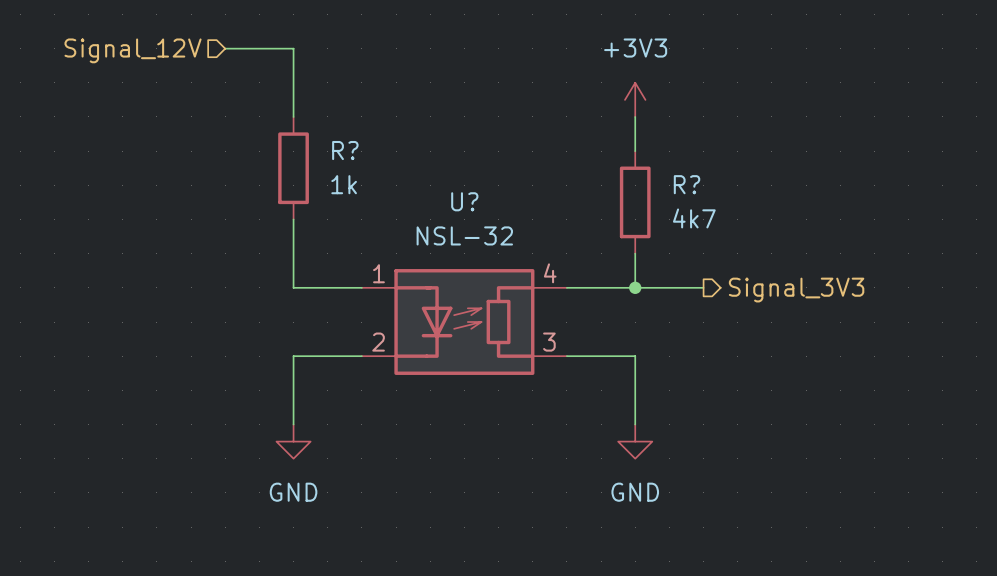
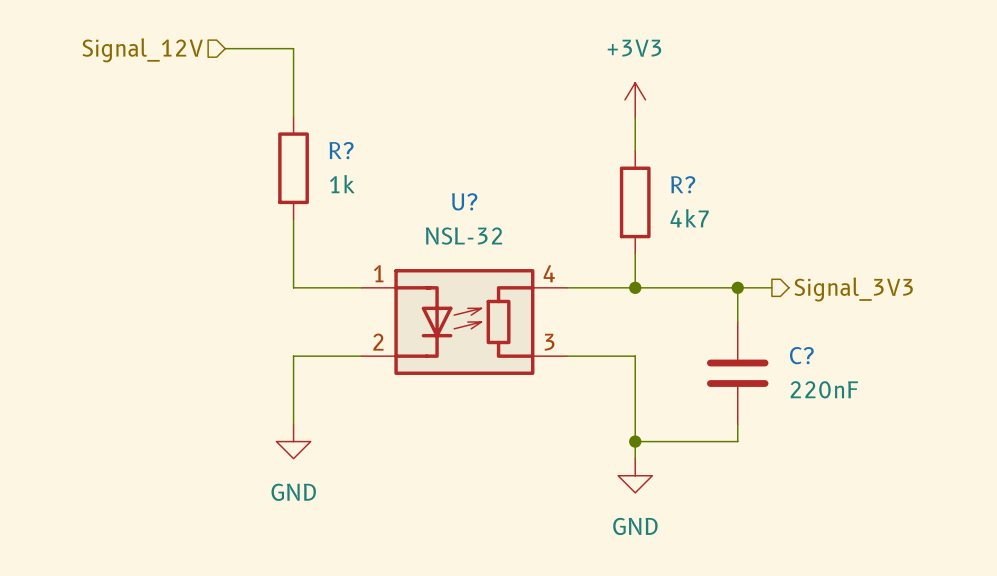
wire: none -> (703, 287) (771, 287)
wire: none -> (737, 287) (737, 322)
junction: none -> (737, 287)
hierarchical label position: Signal_3V3 (796, 290) -> Signal_3V3 (853, 289)
C?: none -> 220nF (737, 373)
wire: none -> (737, 424) (737, 441) (635, 441)
power symbol position: GND (635, 441) -> GND (635, 475)
junction: none -> (635, 441)

